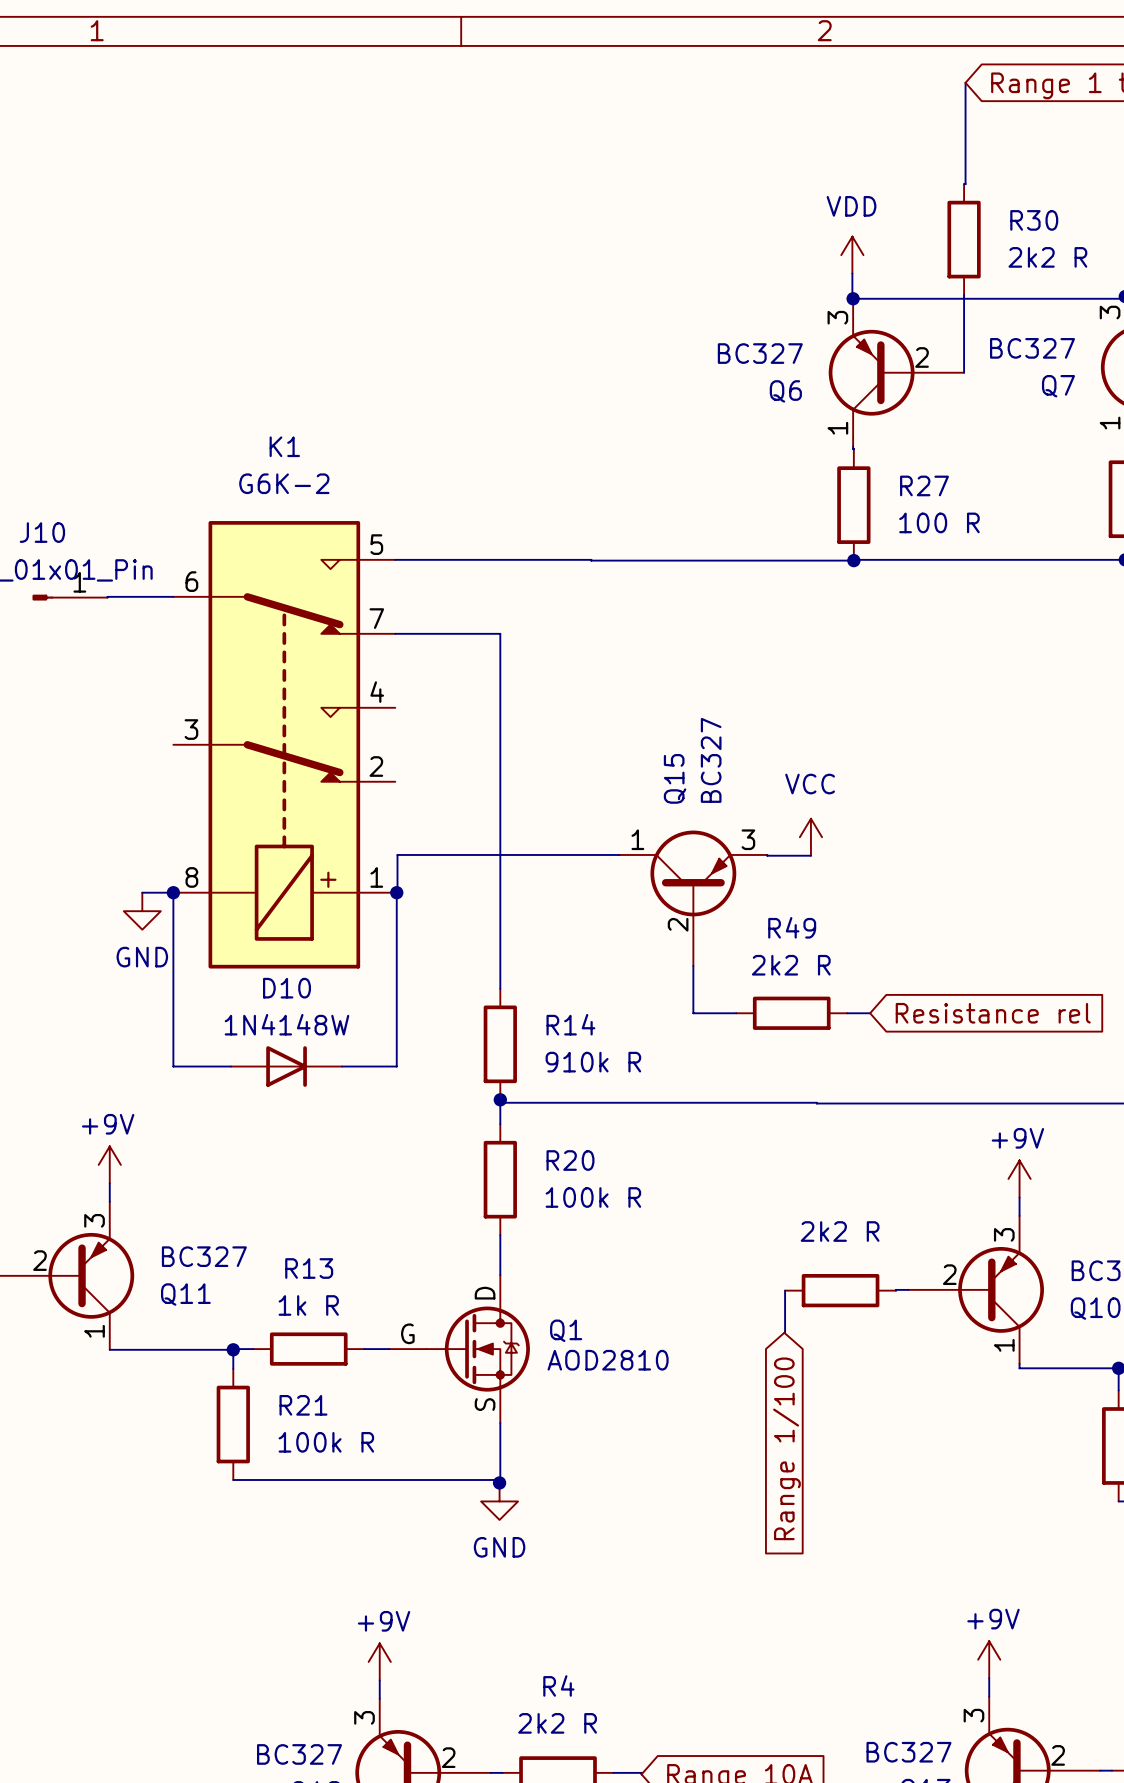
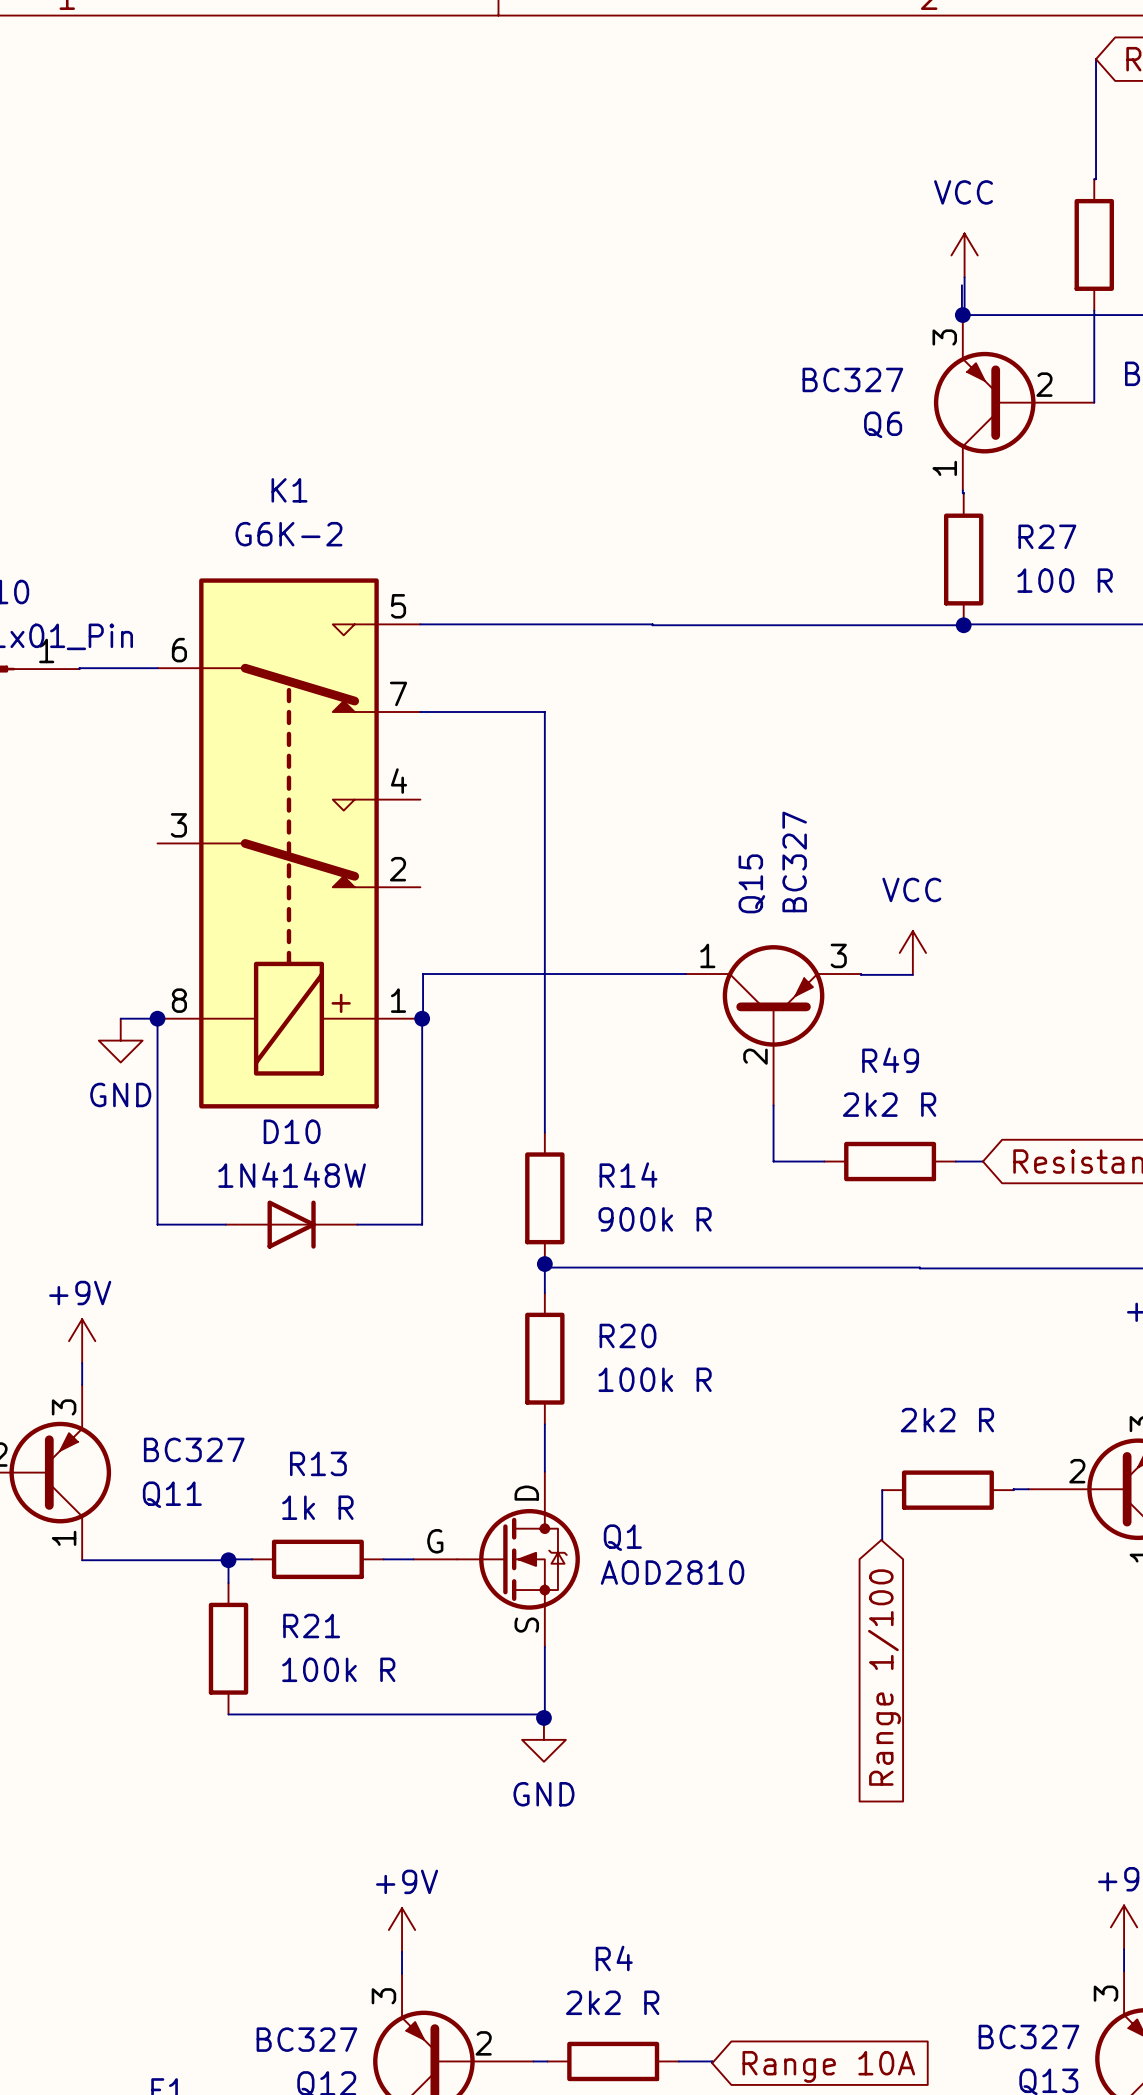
power symbol: VDD (852, 255) -> VCC (964, 255)
wire: none -> (964, 277) (964, 315)
R14 value: 910k R (593, 1062) -> 900k R (655, 1219)

